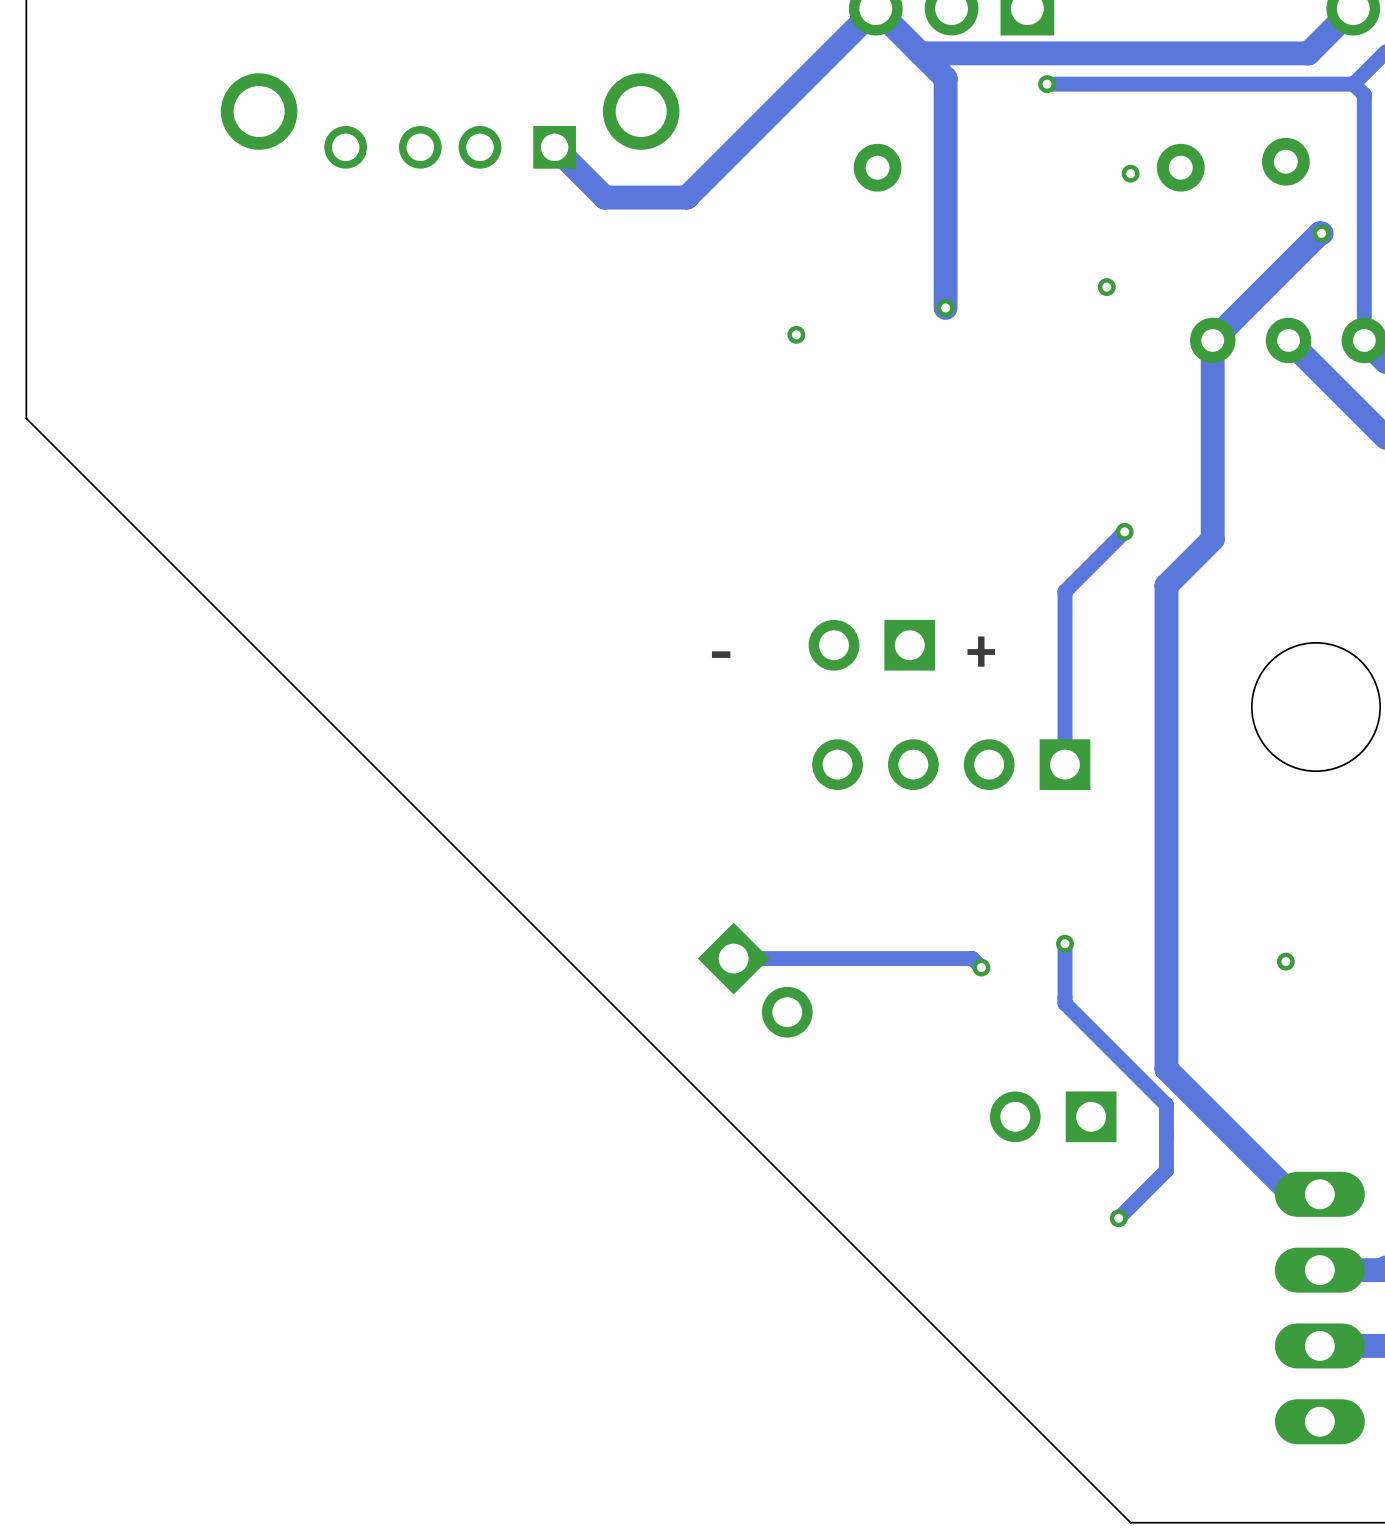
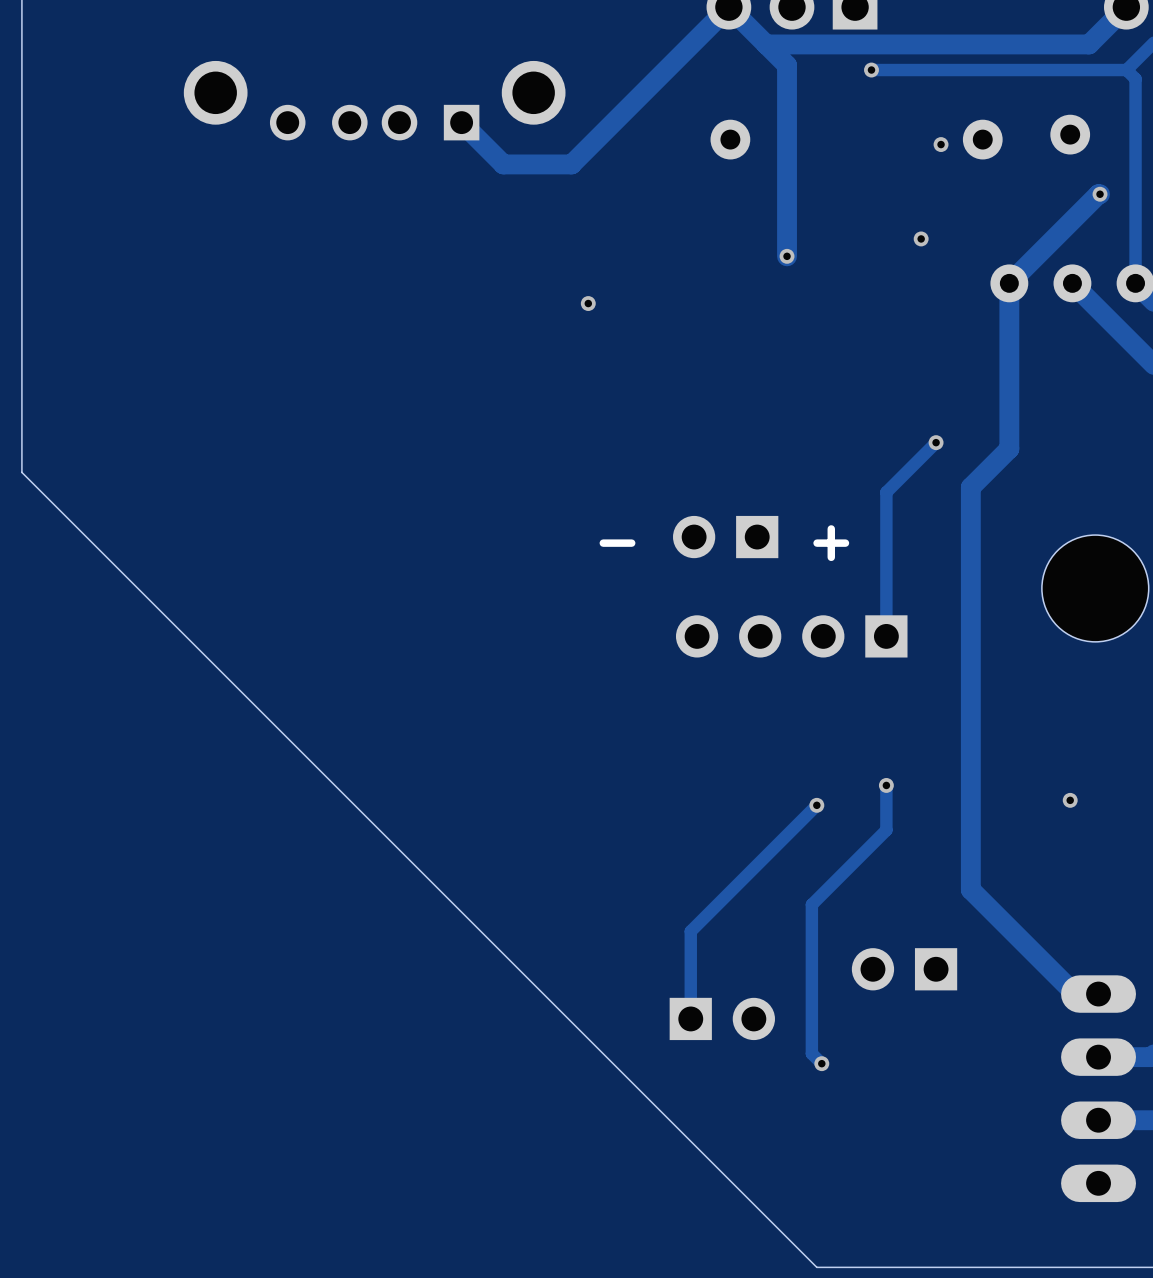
via position: (796, 334) -> (588, 303)
board edge: (26, 418) (1130, 1522) -> (21, 348) (21, 472) (816, 1267) (941, 1267)
track: (733, 958) (972, 958) (981, 967) -> (690, 1018) (690, 931) (816, 805)
part: (755, 980) -> none
track: (1064, 997) (1064, 1003) (1166, 1104) (1166, 1170) (1118, 1218) -> (886, 830) (811, 904) (811, 1053) (821, 1063)
part position: (1053, 1116) -> (904, 969)
via position: (1118, 1218) -> (821, 1063)
part: none -> (722, 1018)

